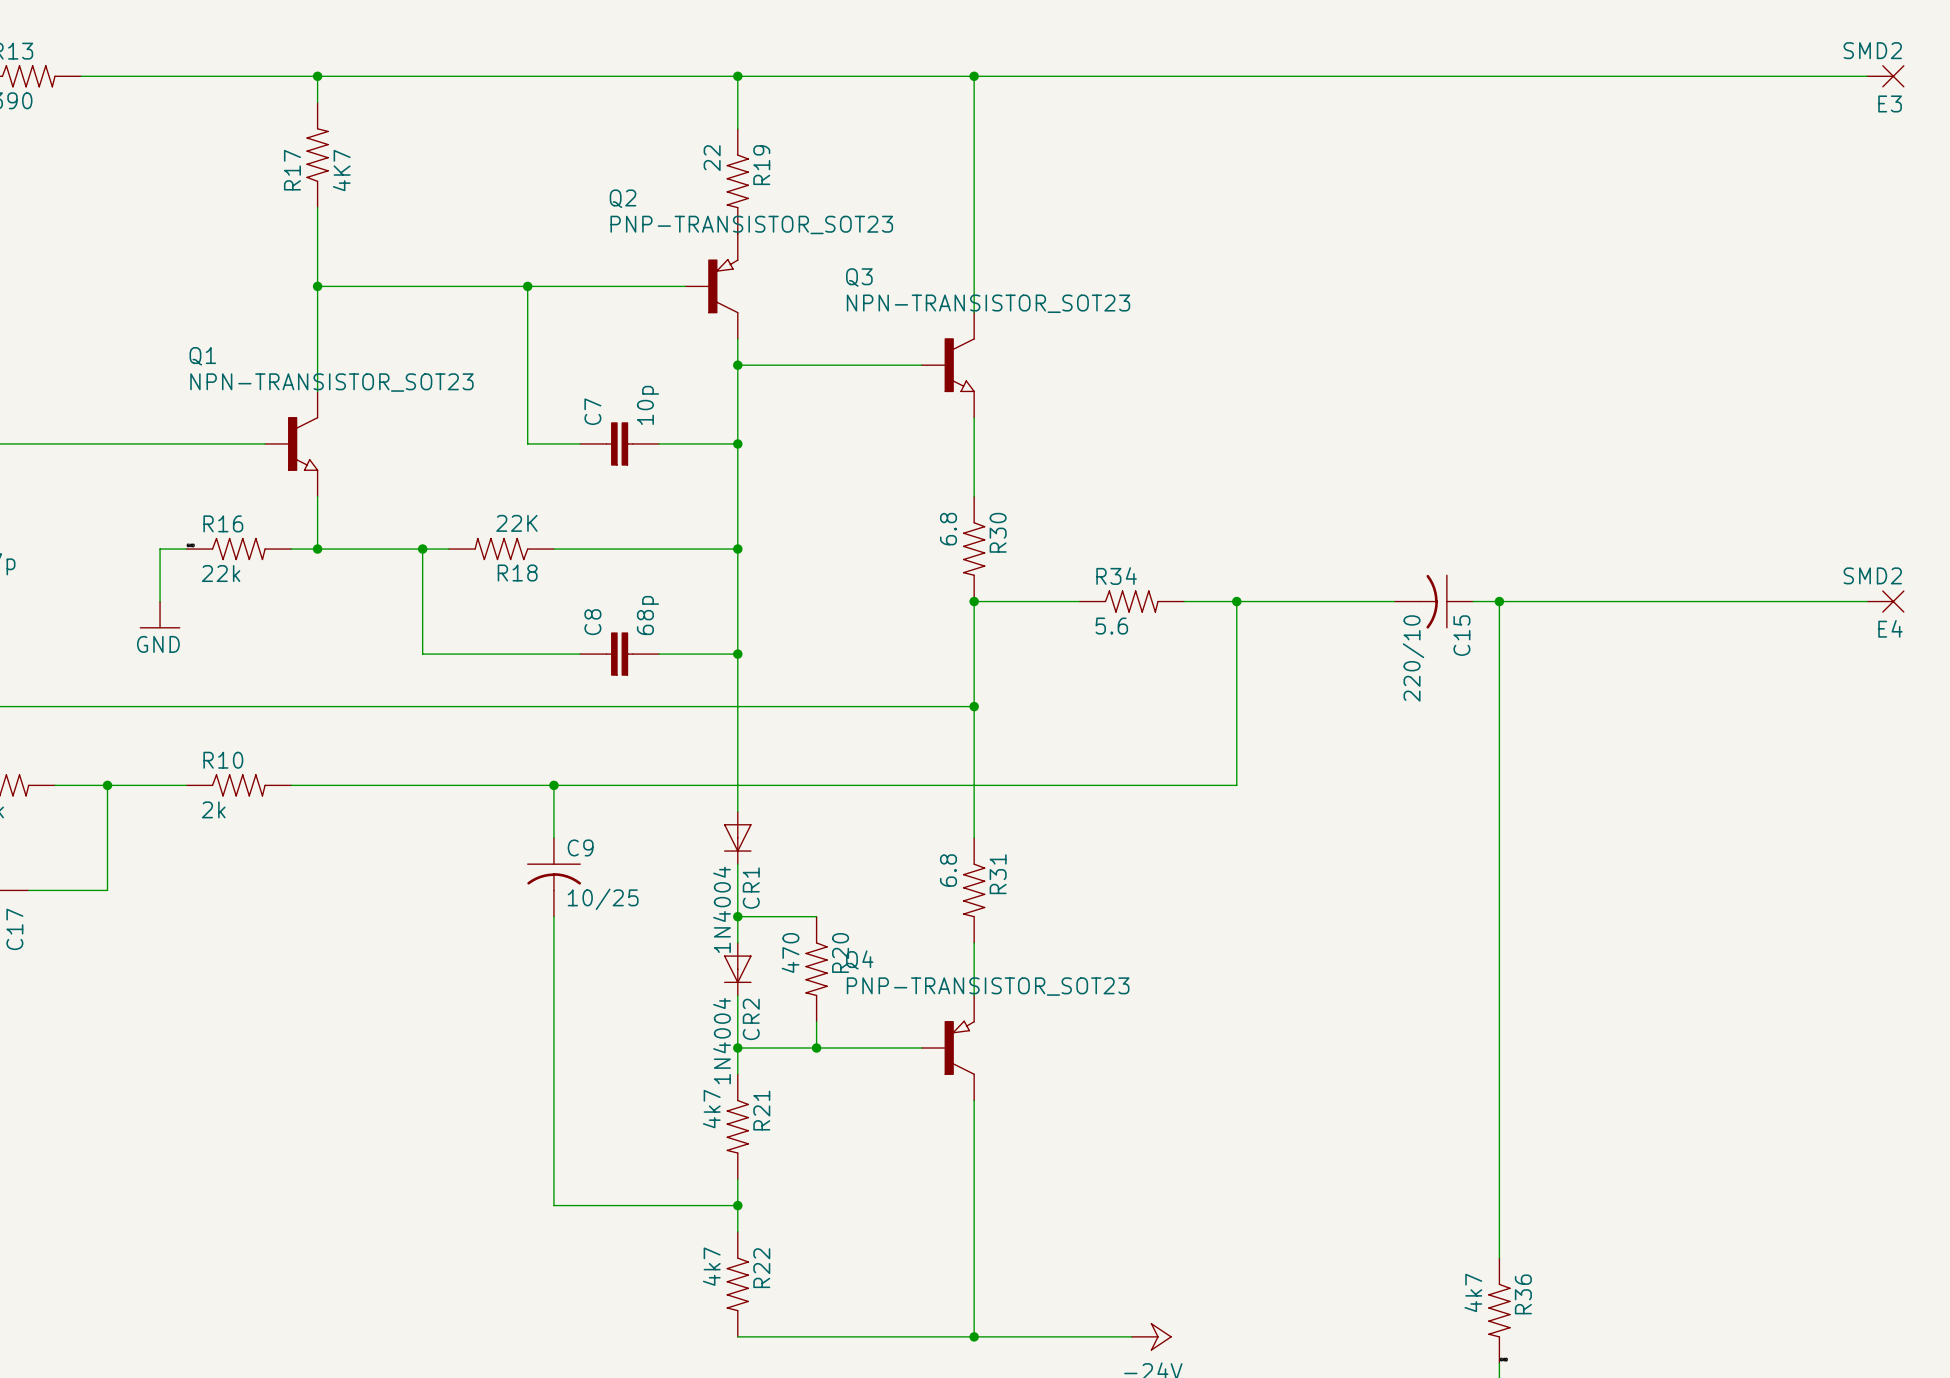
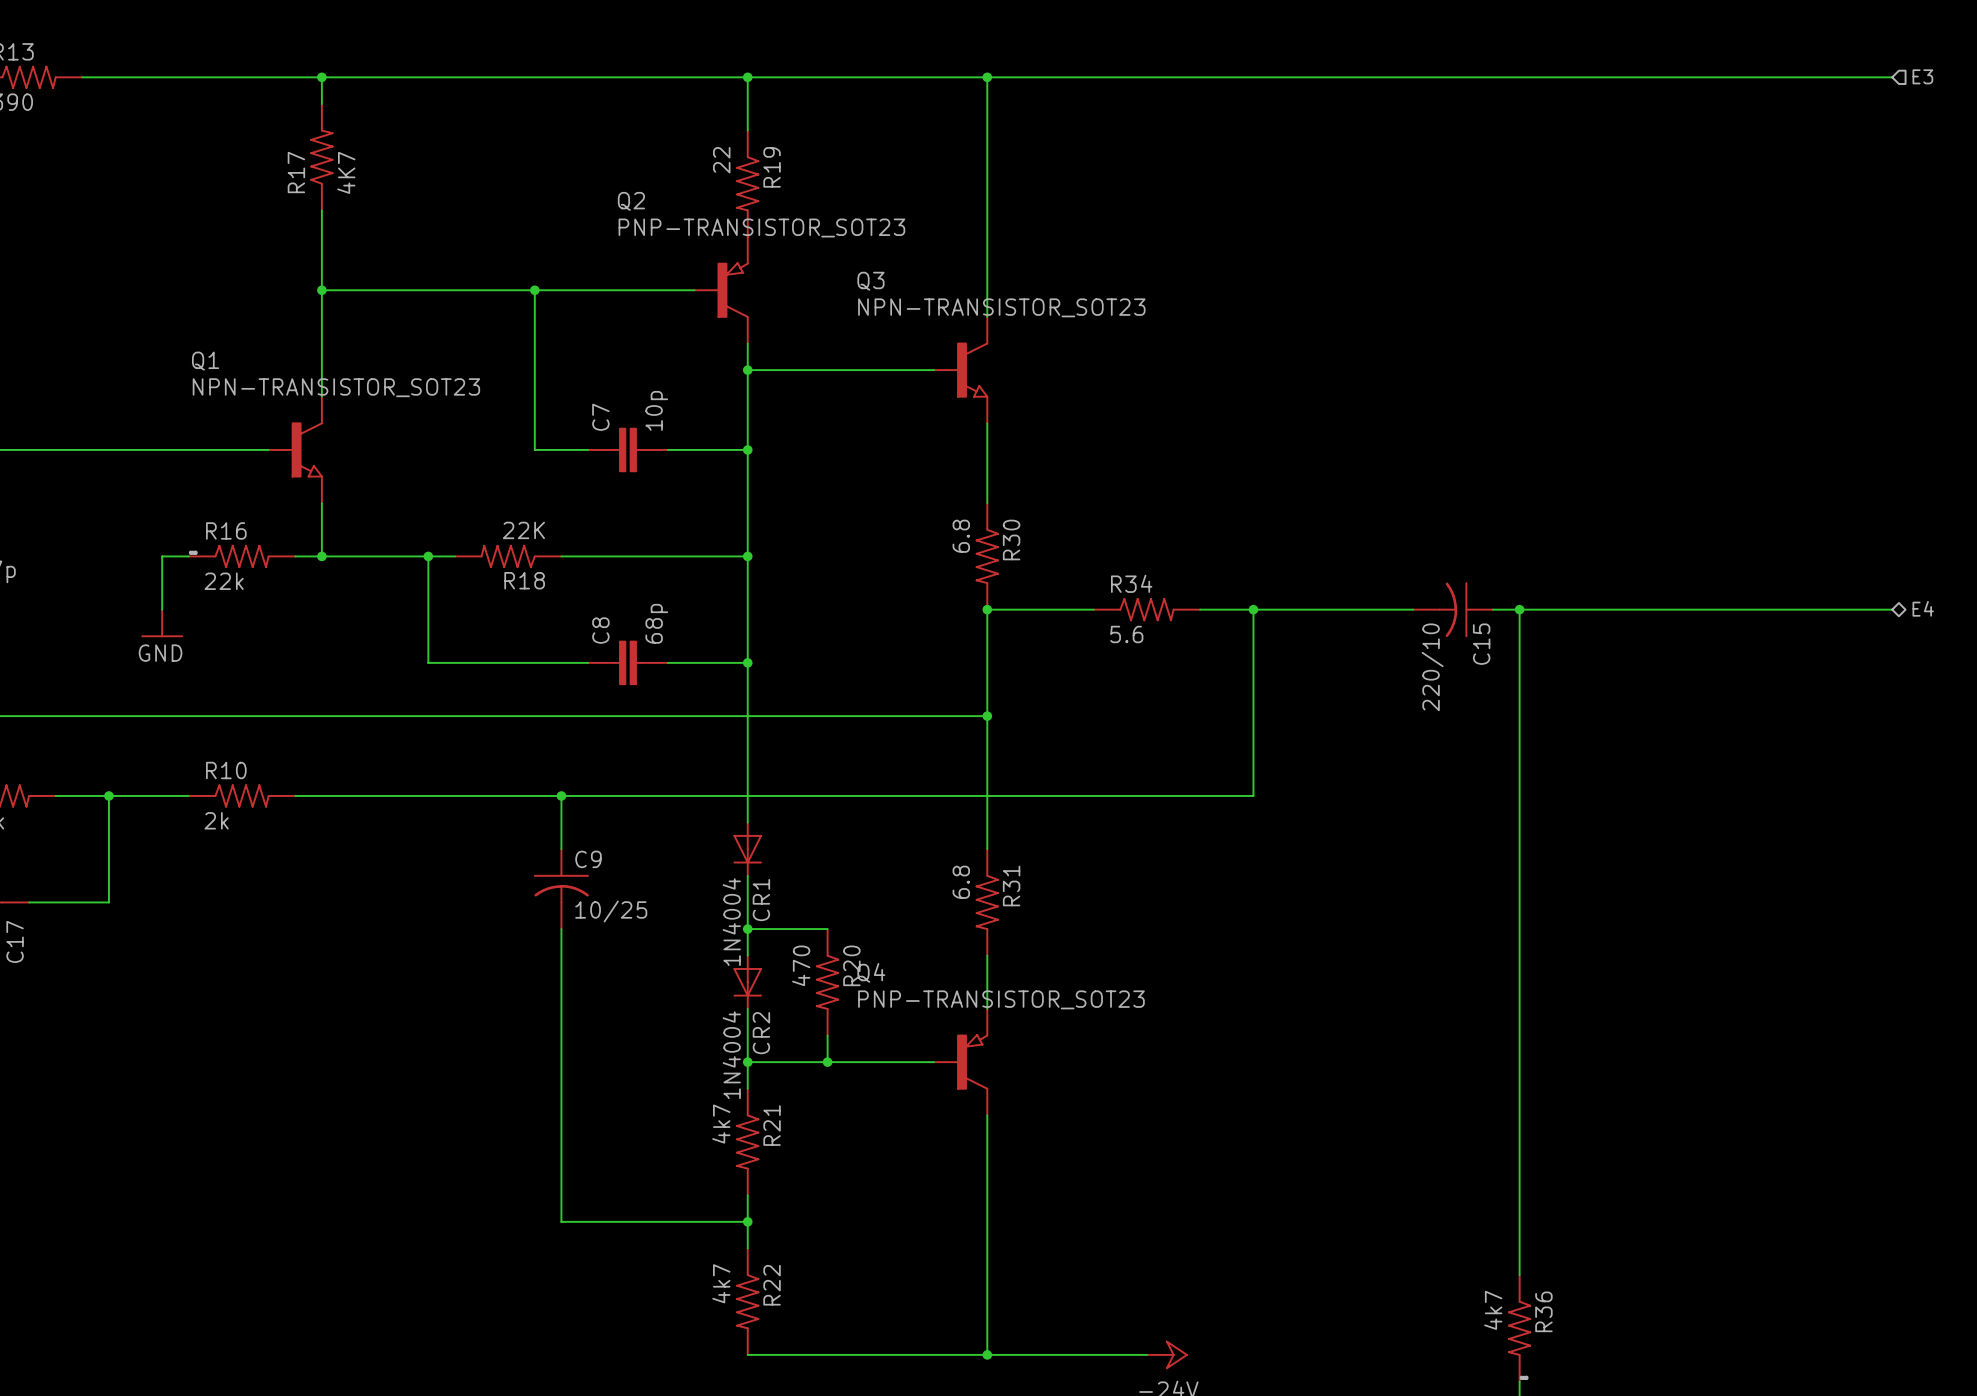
hierarchical label: none -> E3 (1922, 76)
E3: SMD2 (1885, 76) -> none
hierarchical label: none -> E4 (1923, 608)
E4: SMD2 (1885, 601) -> none

